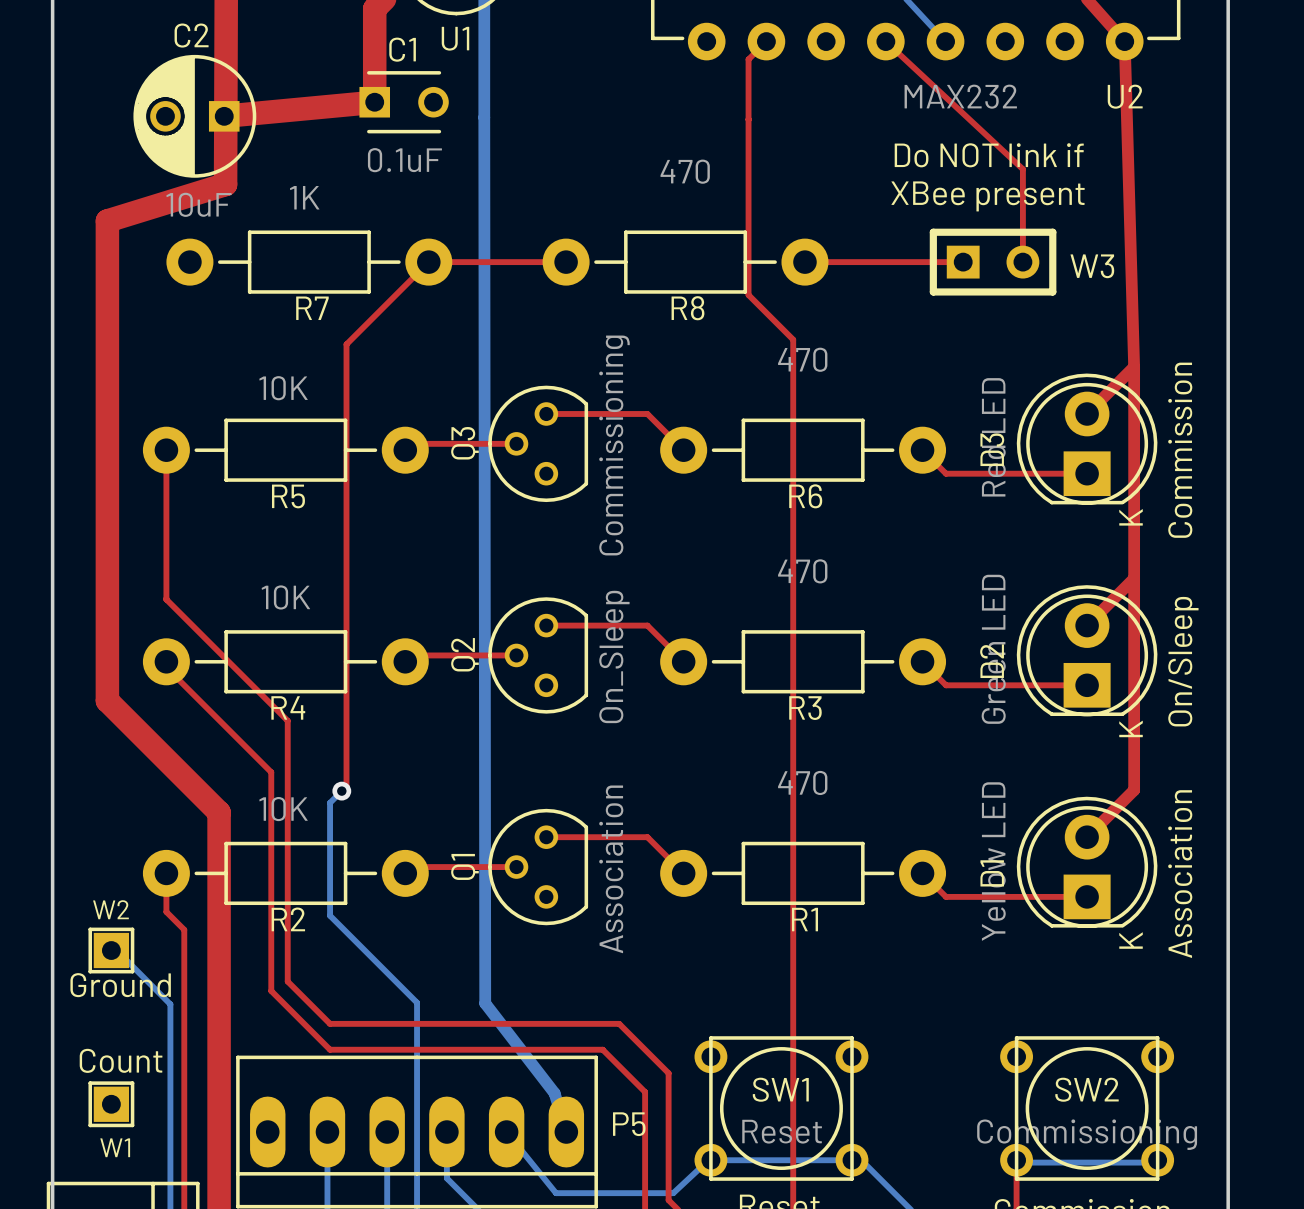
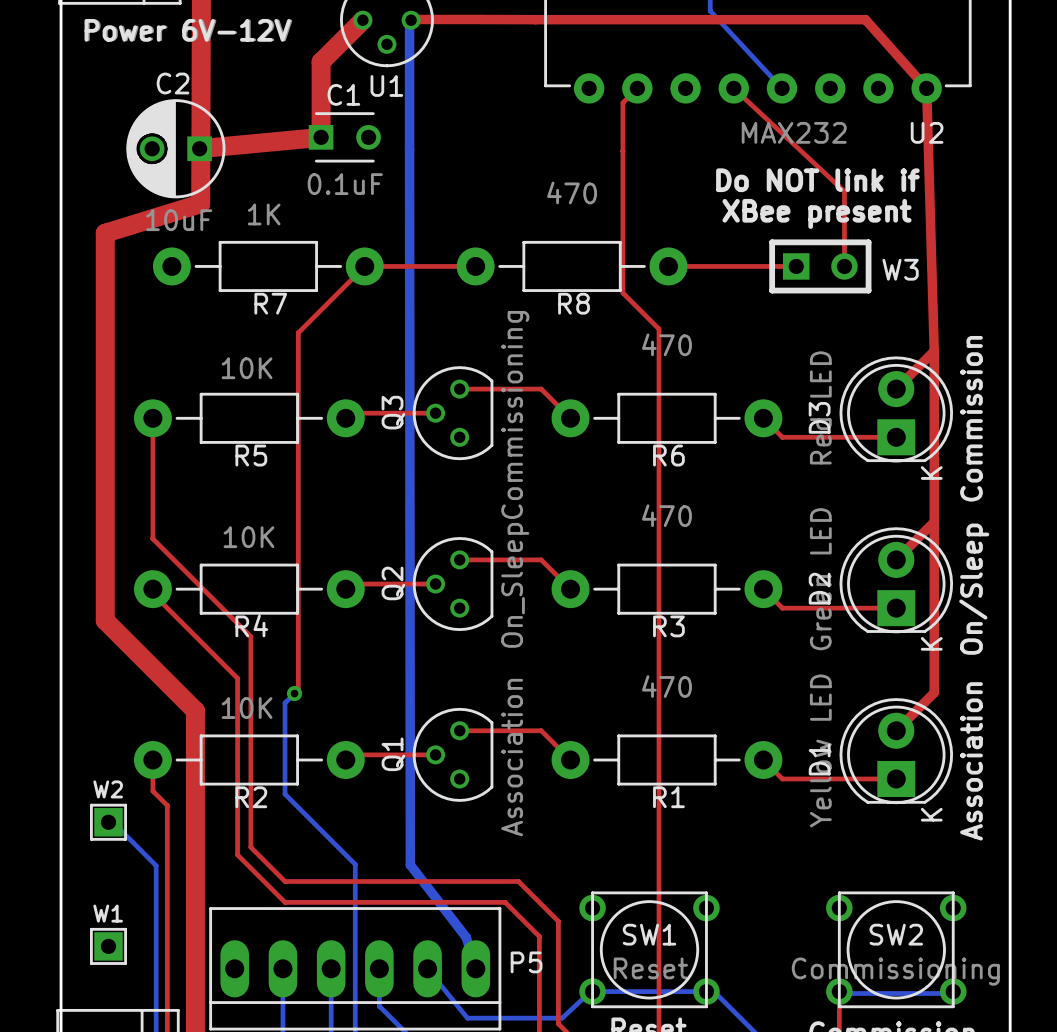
text: Ground (120, 985) -> none
text: Count (121, 1060) -> none
W1 name position: W1 (115, 1147) -> W1 (108, 913)

